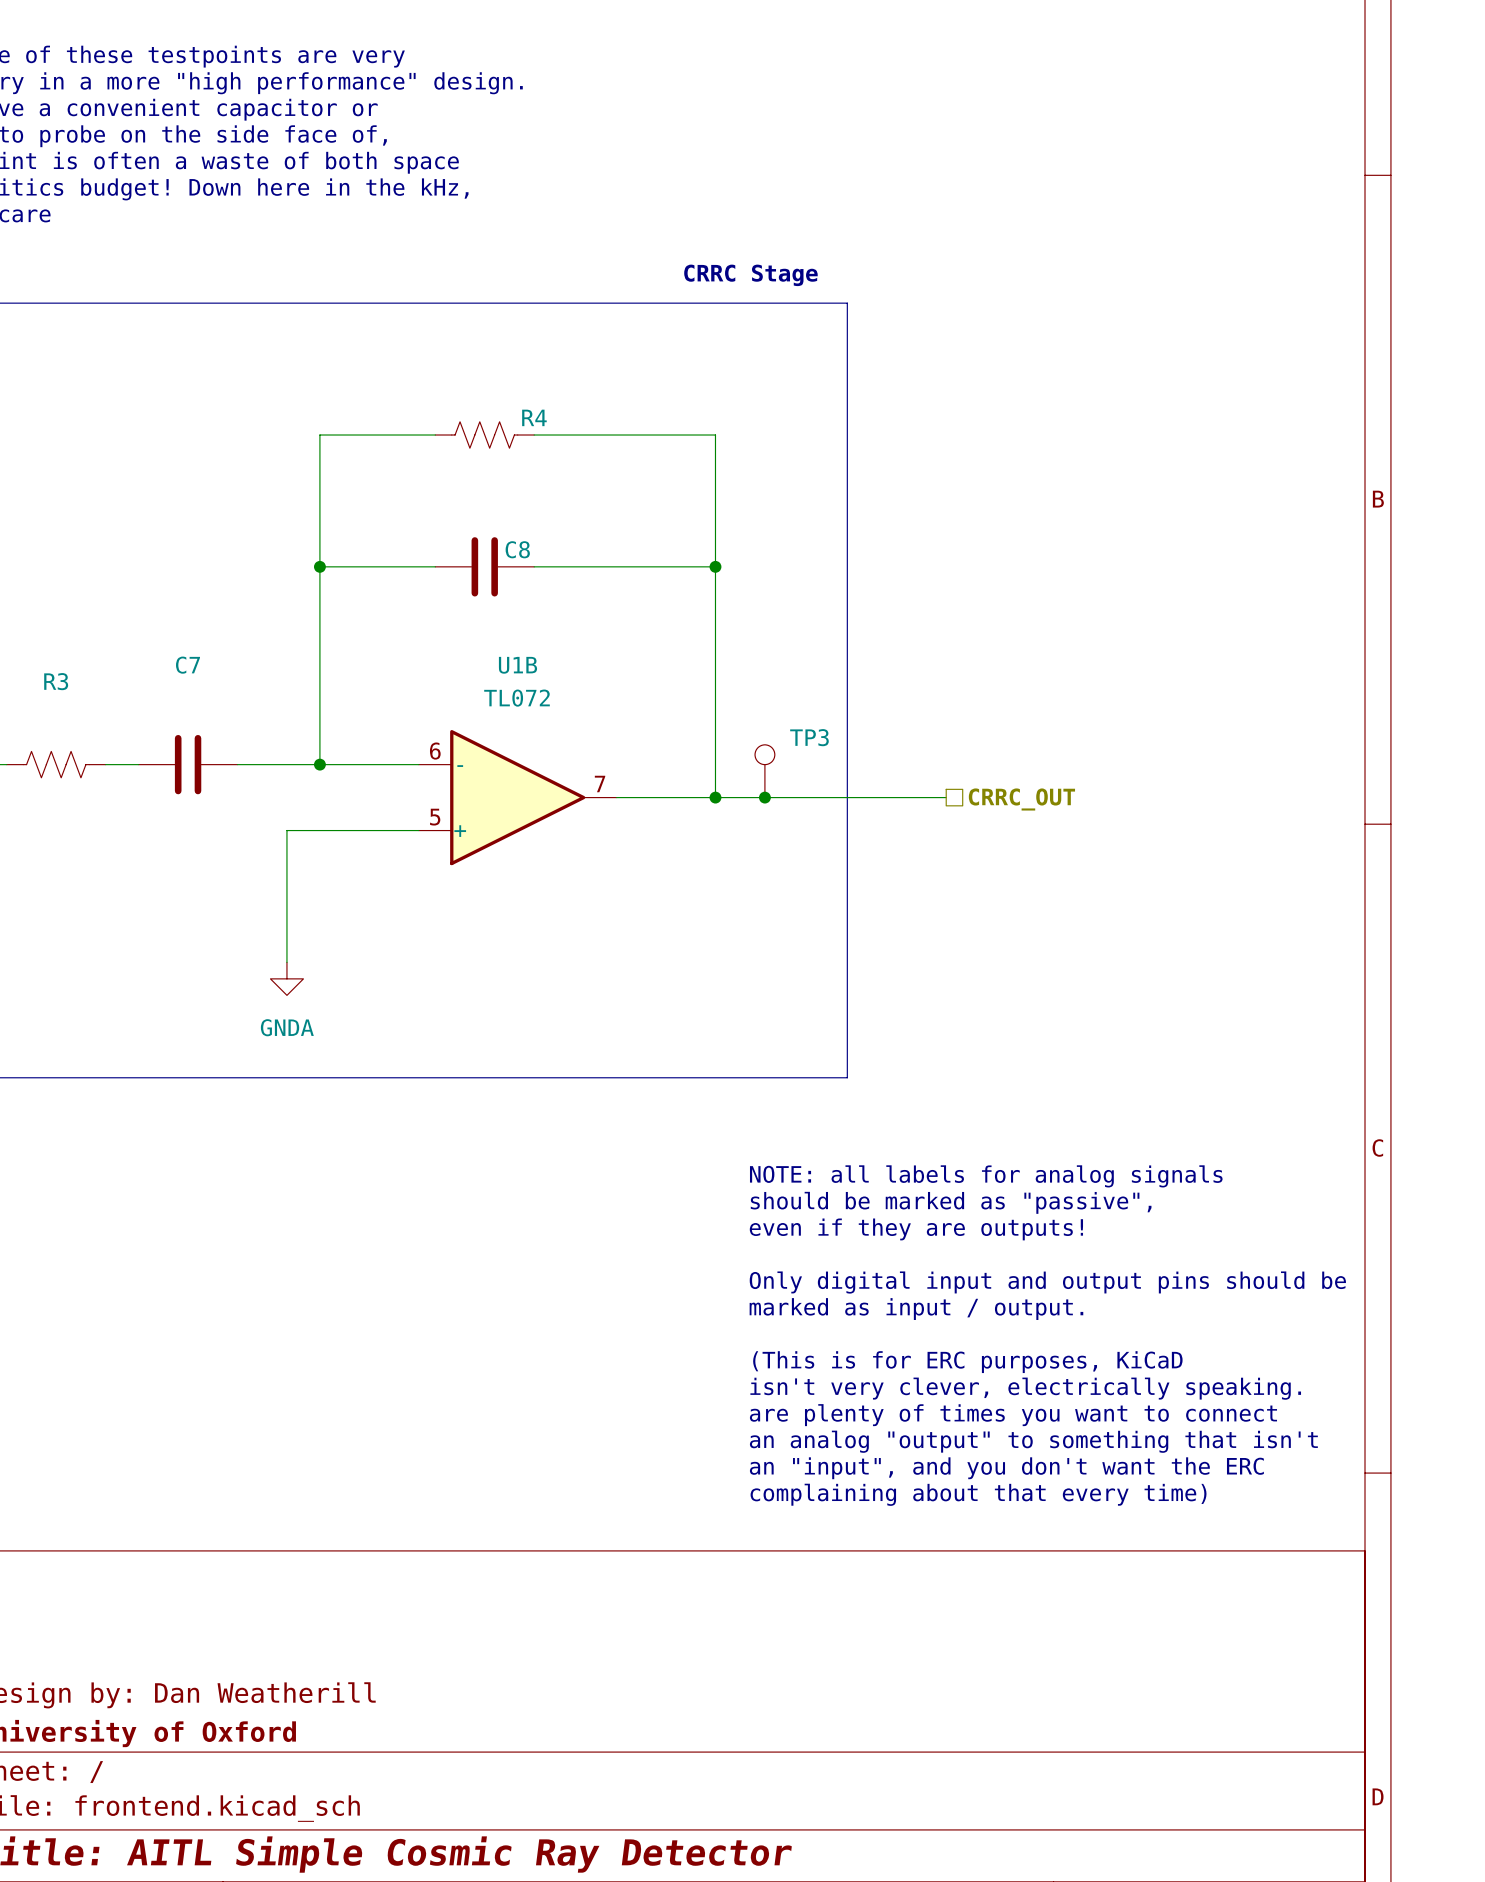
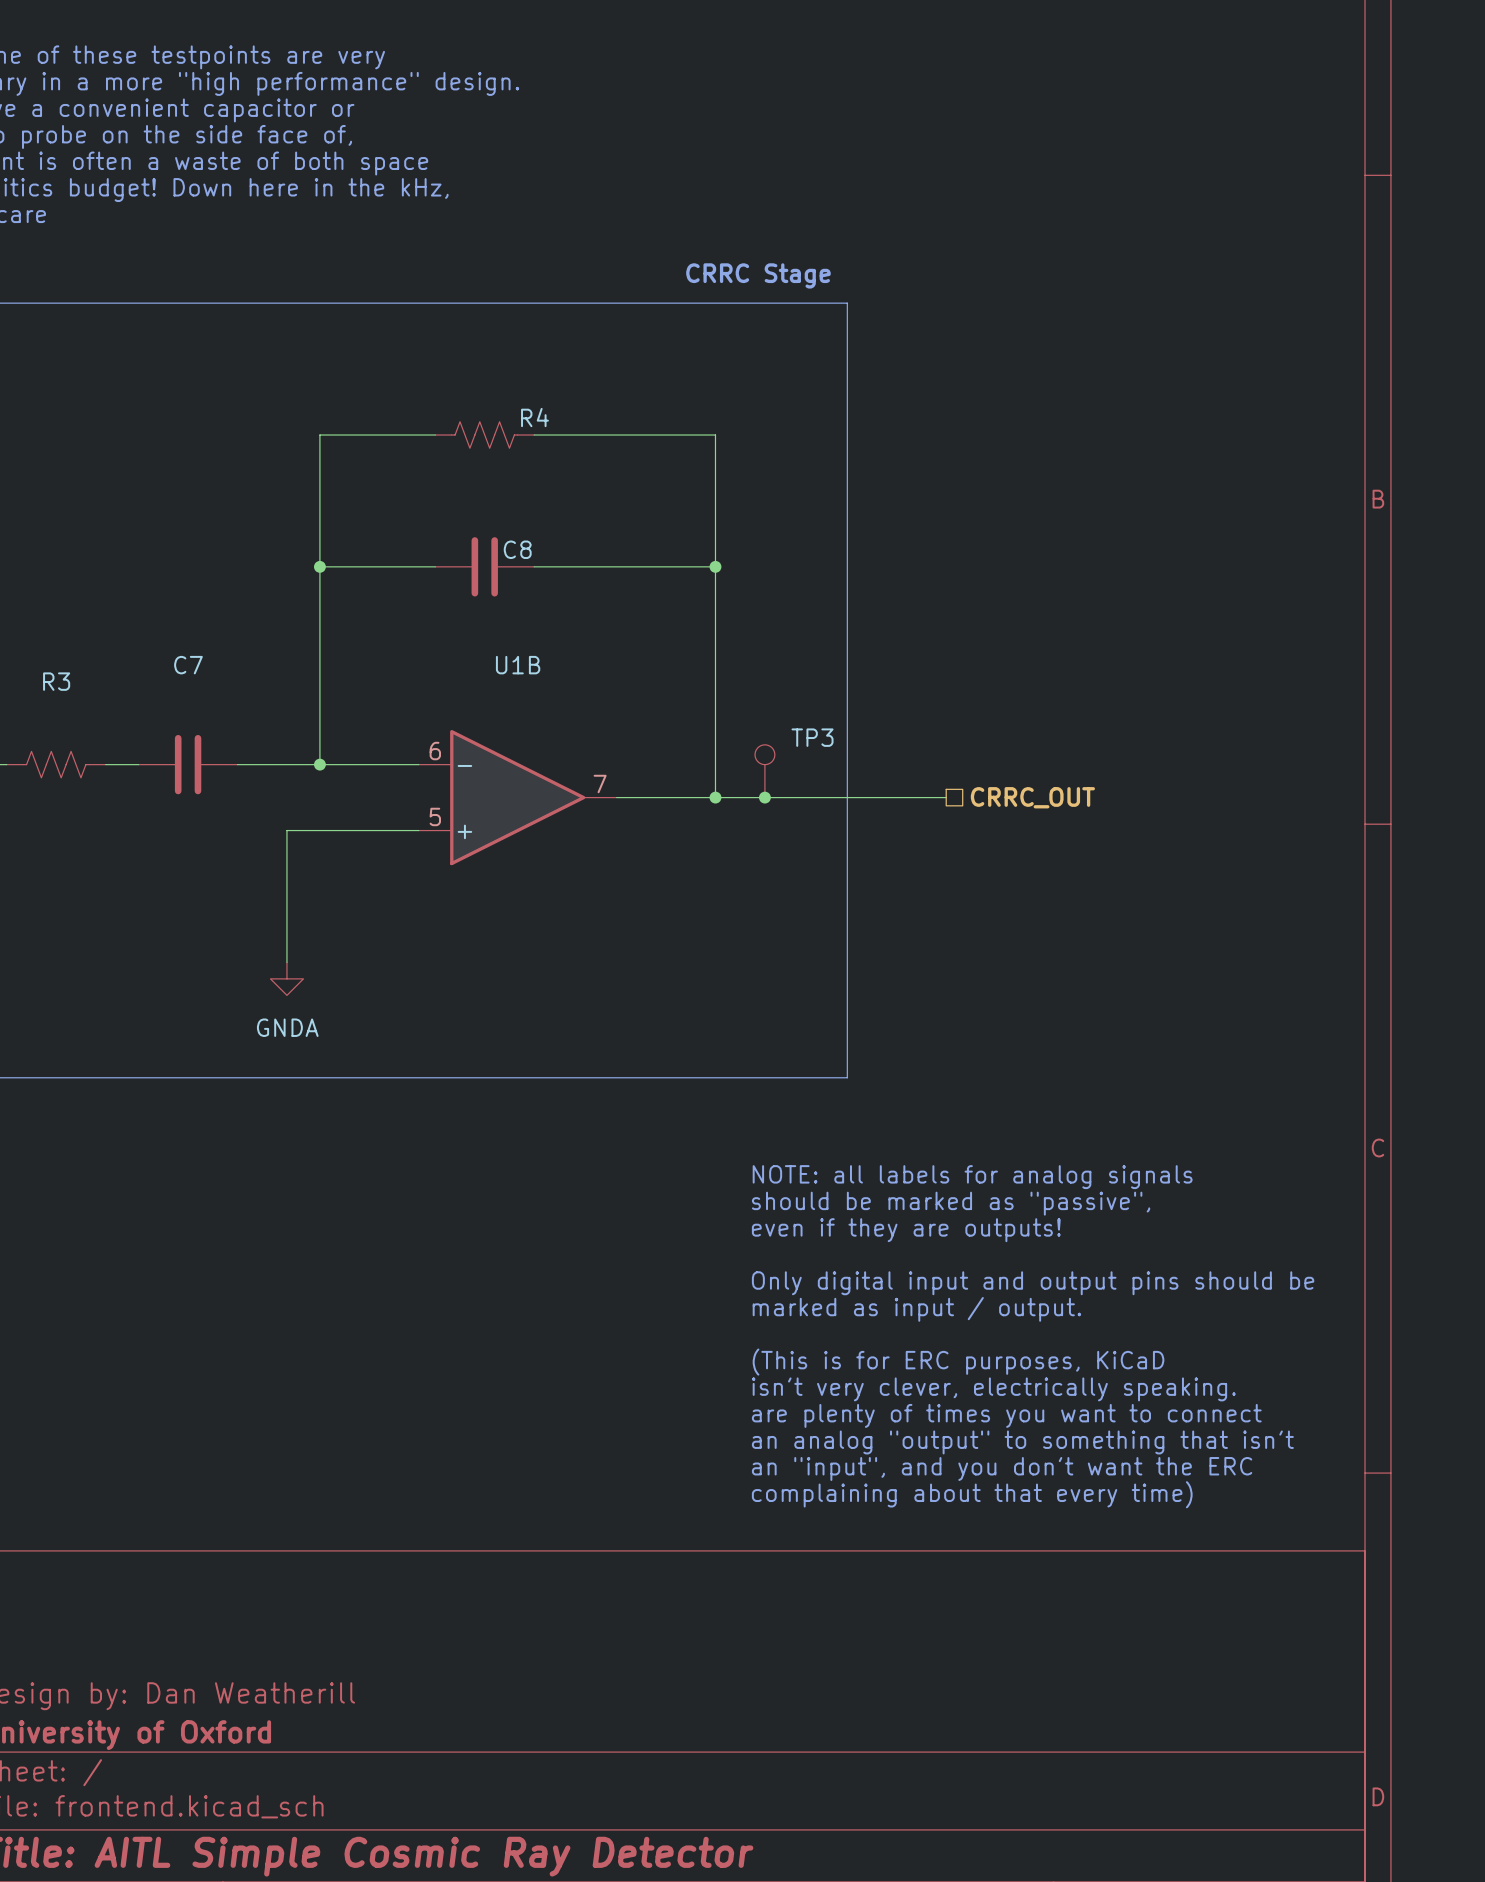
U1B value: TL072 (517, 698) -> none

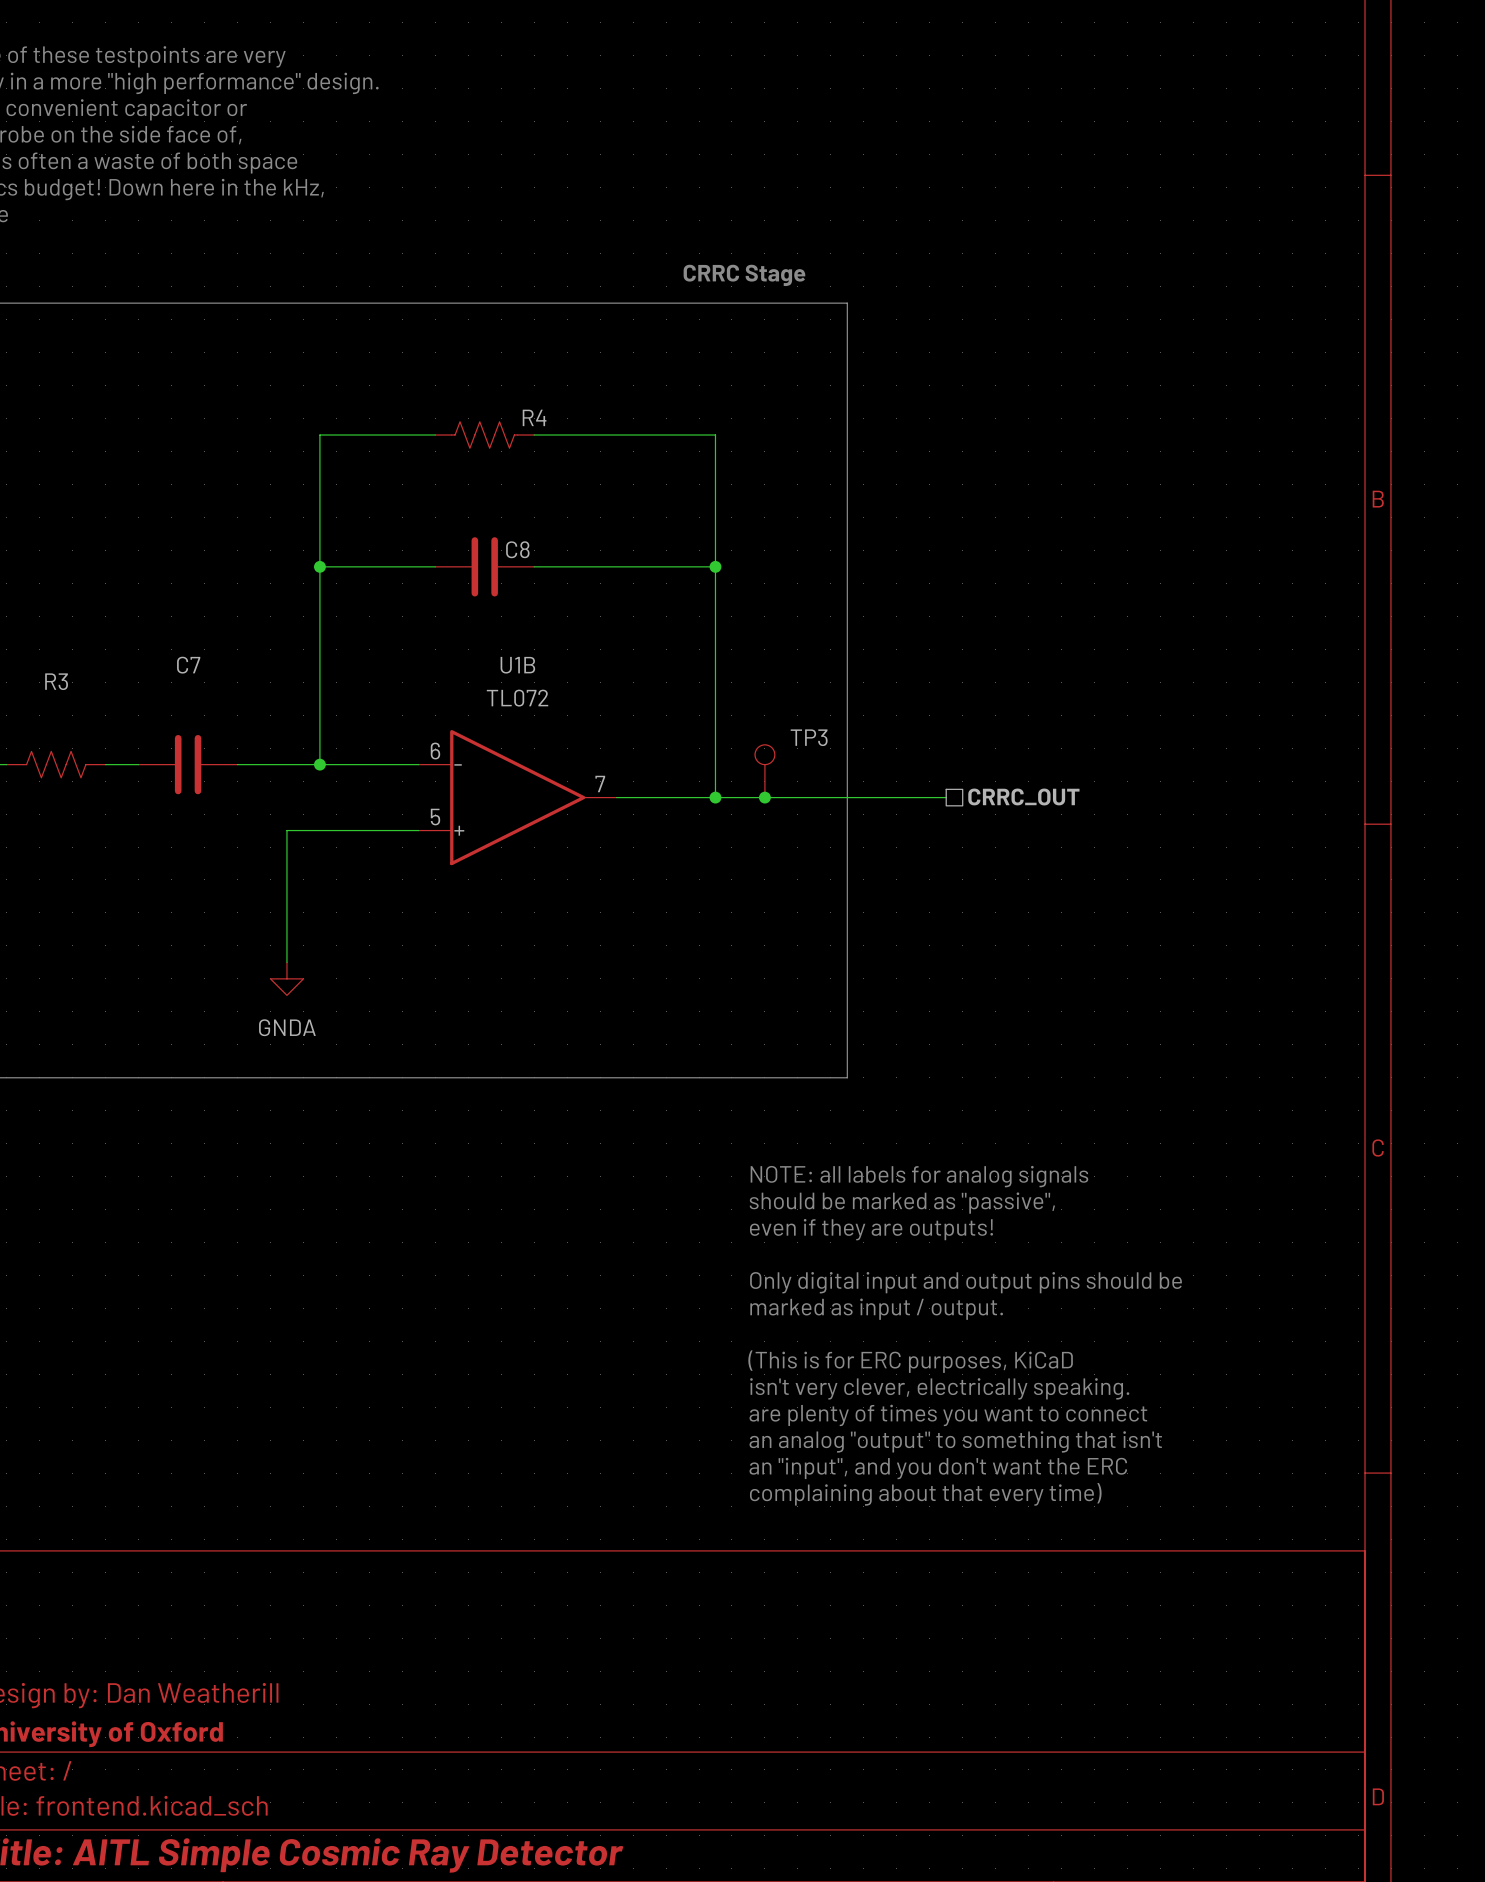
U1B value: none -> TL072 (517, 698)

